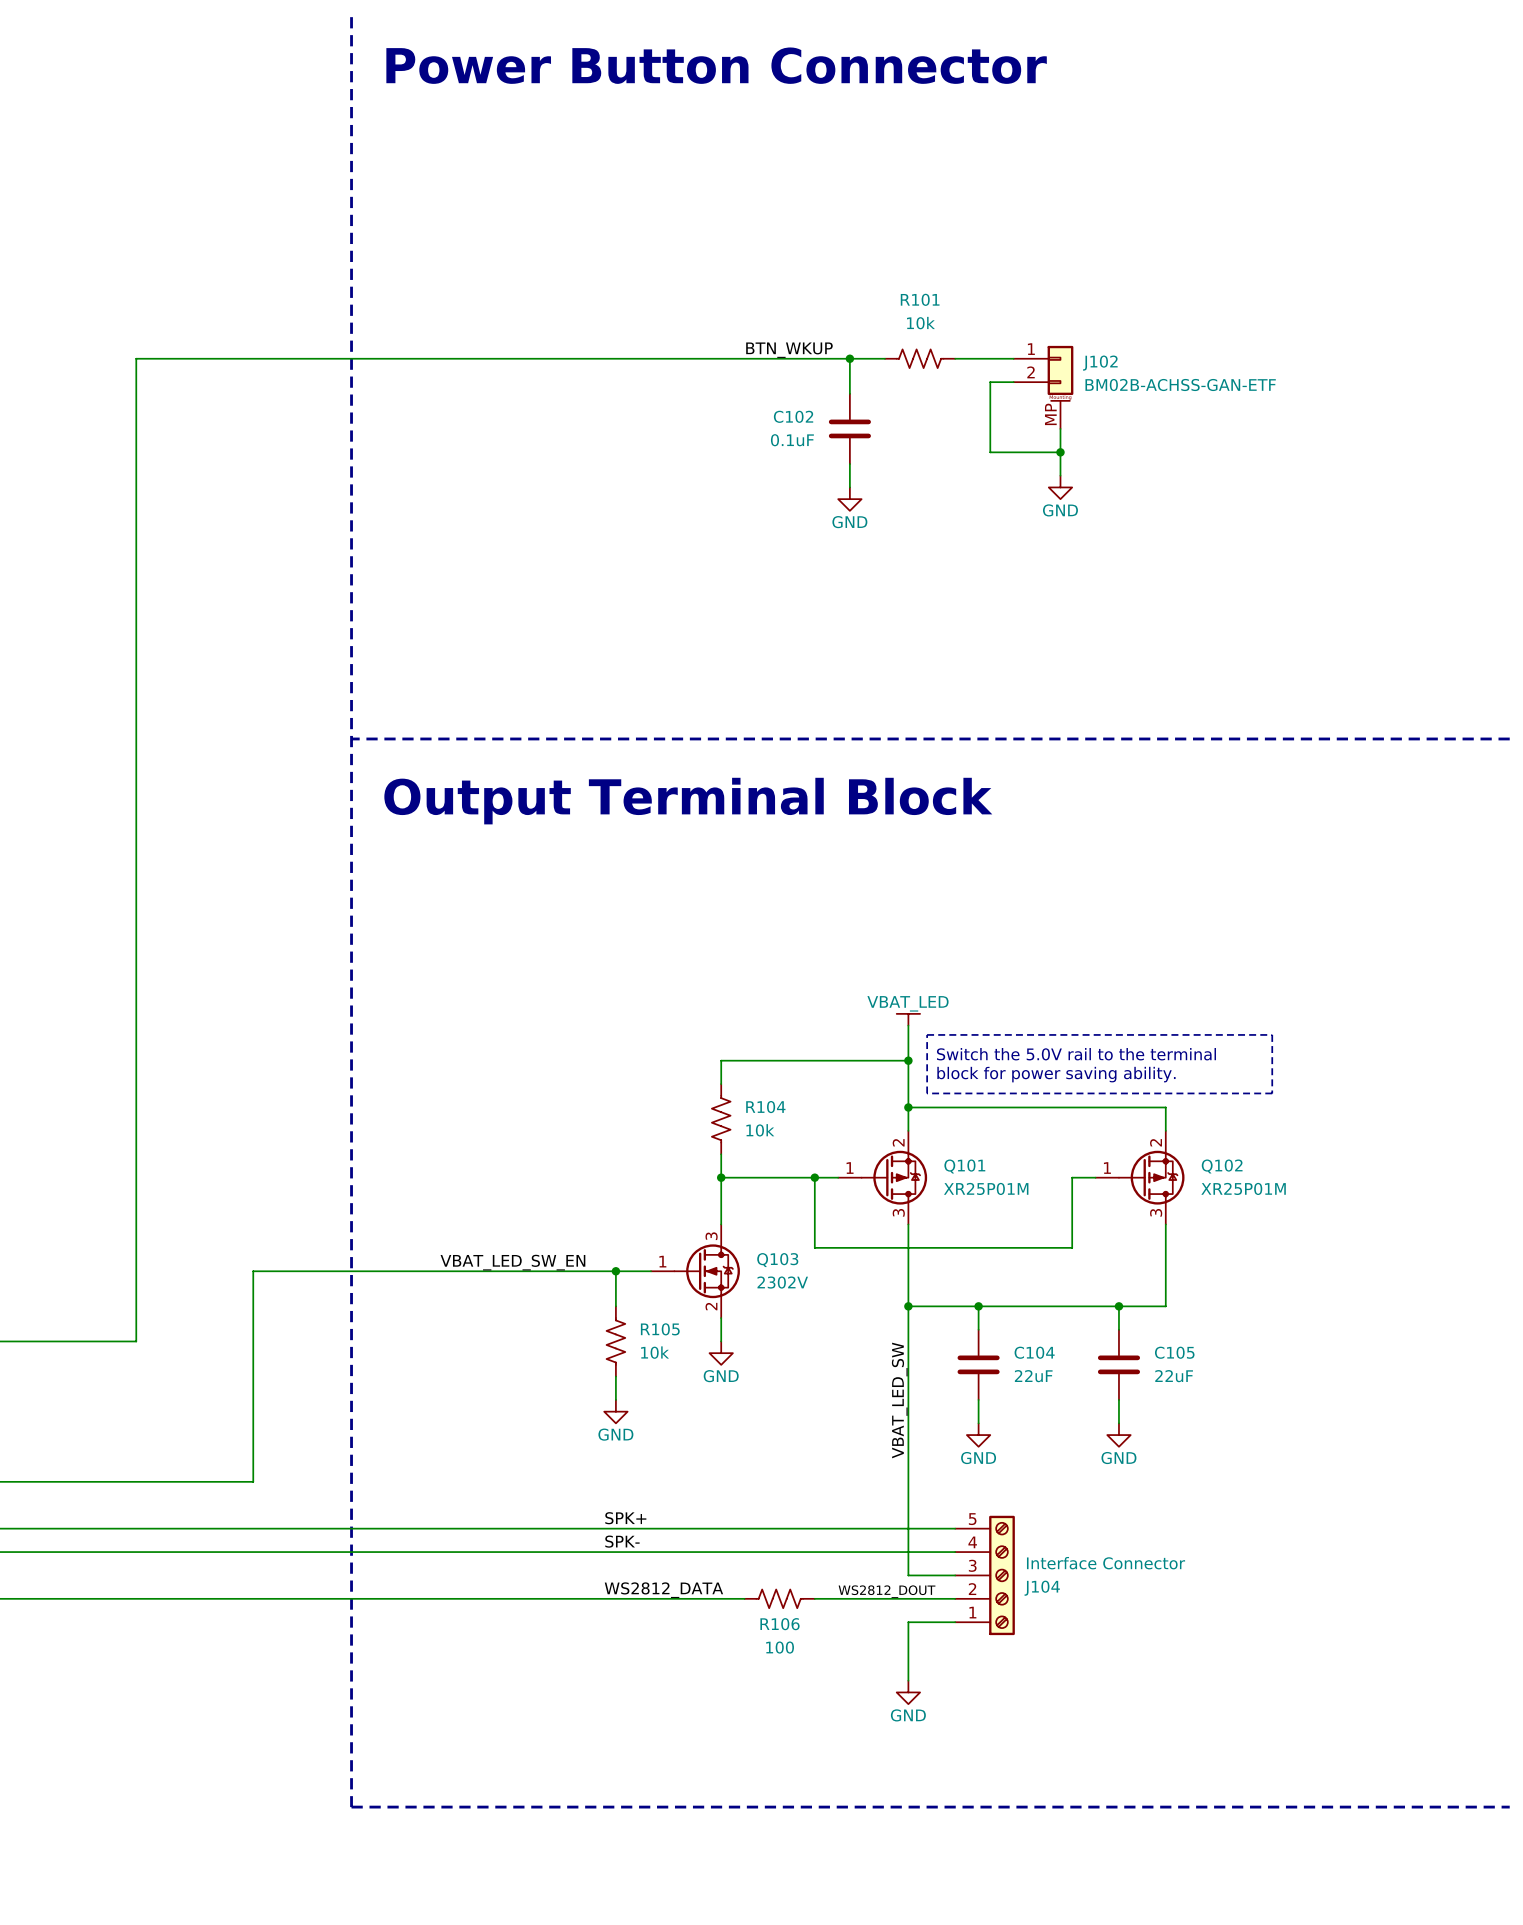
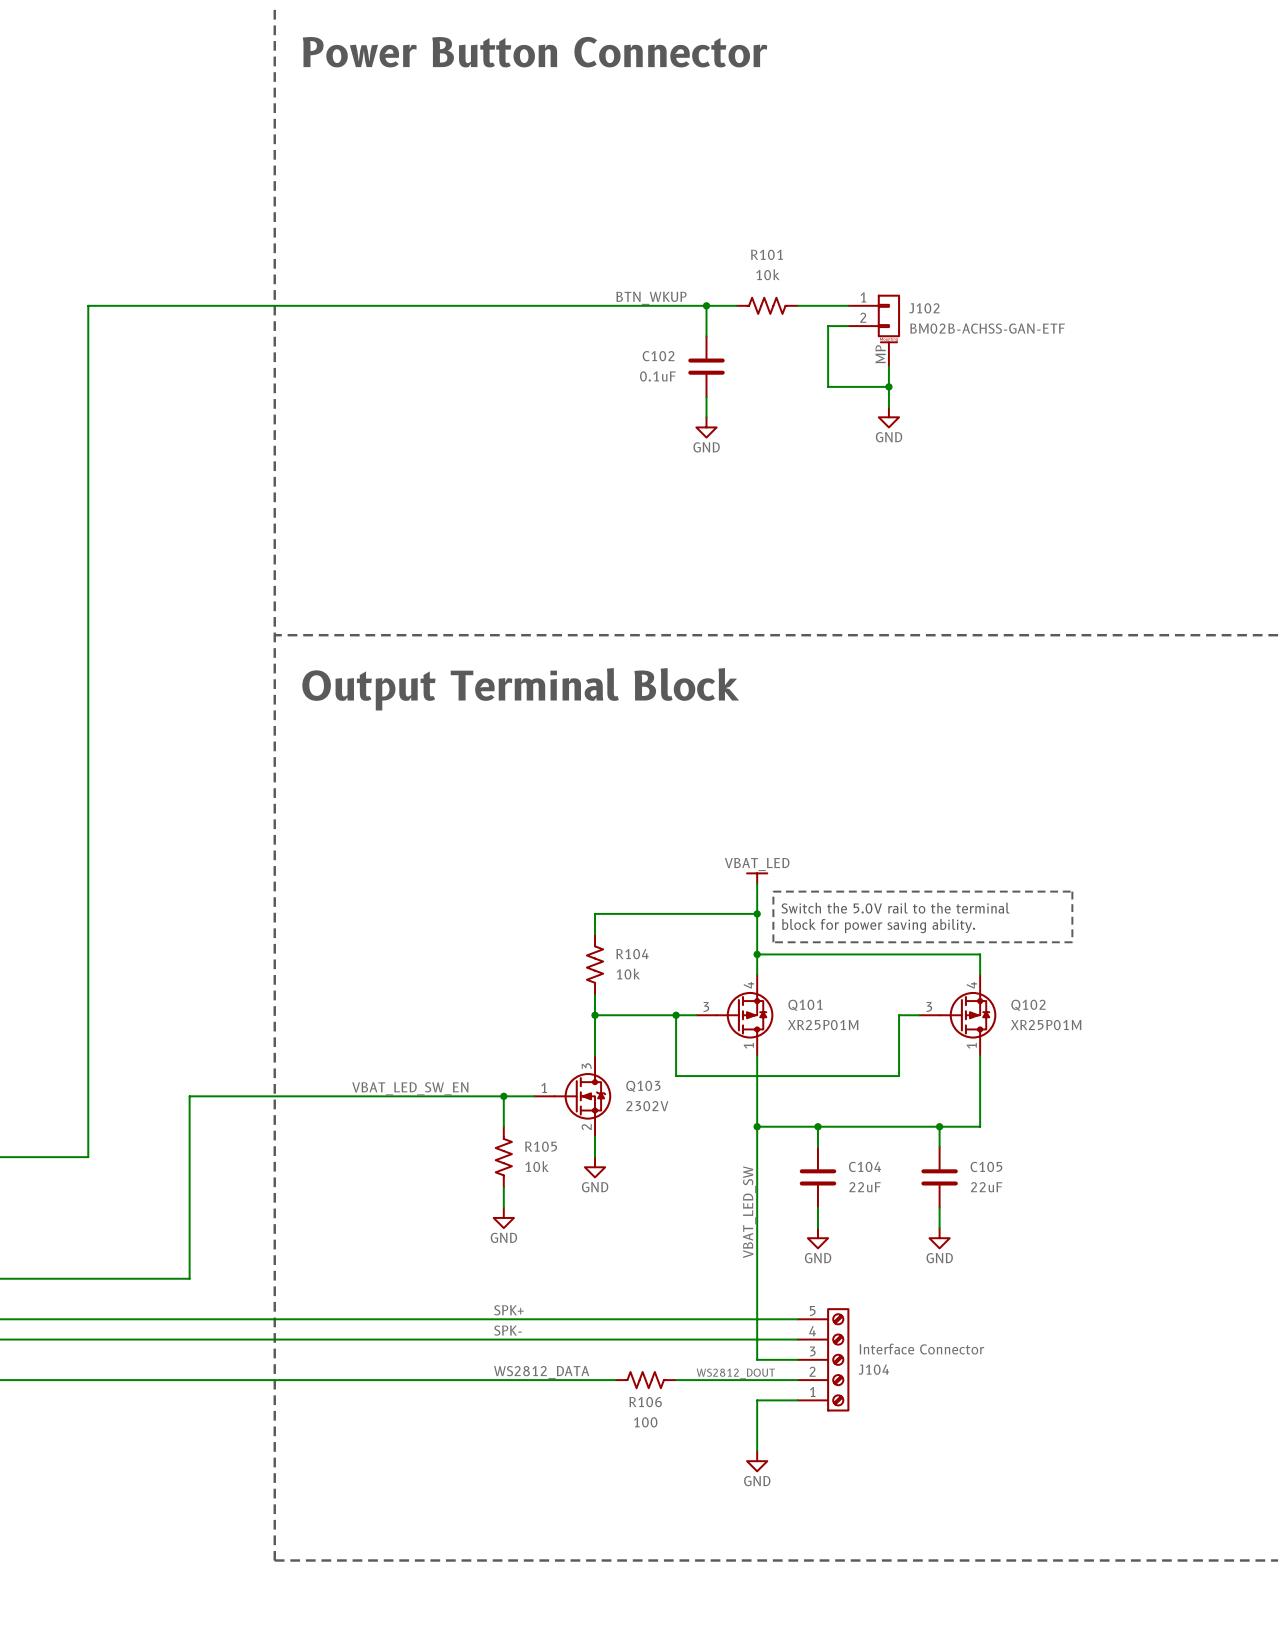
Q101 symbol: [838, 1130, 928, 1225] -> [696, 974, 774, 1056]
Q102 symbol: [1095, 1130, 1185, 1225] -> [919, 974, 997, 1056]

